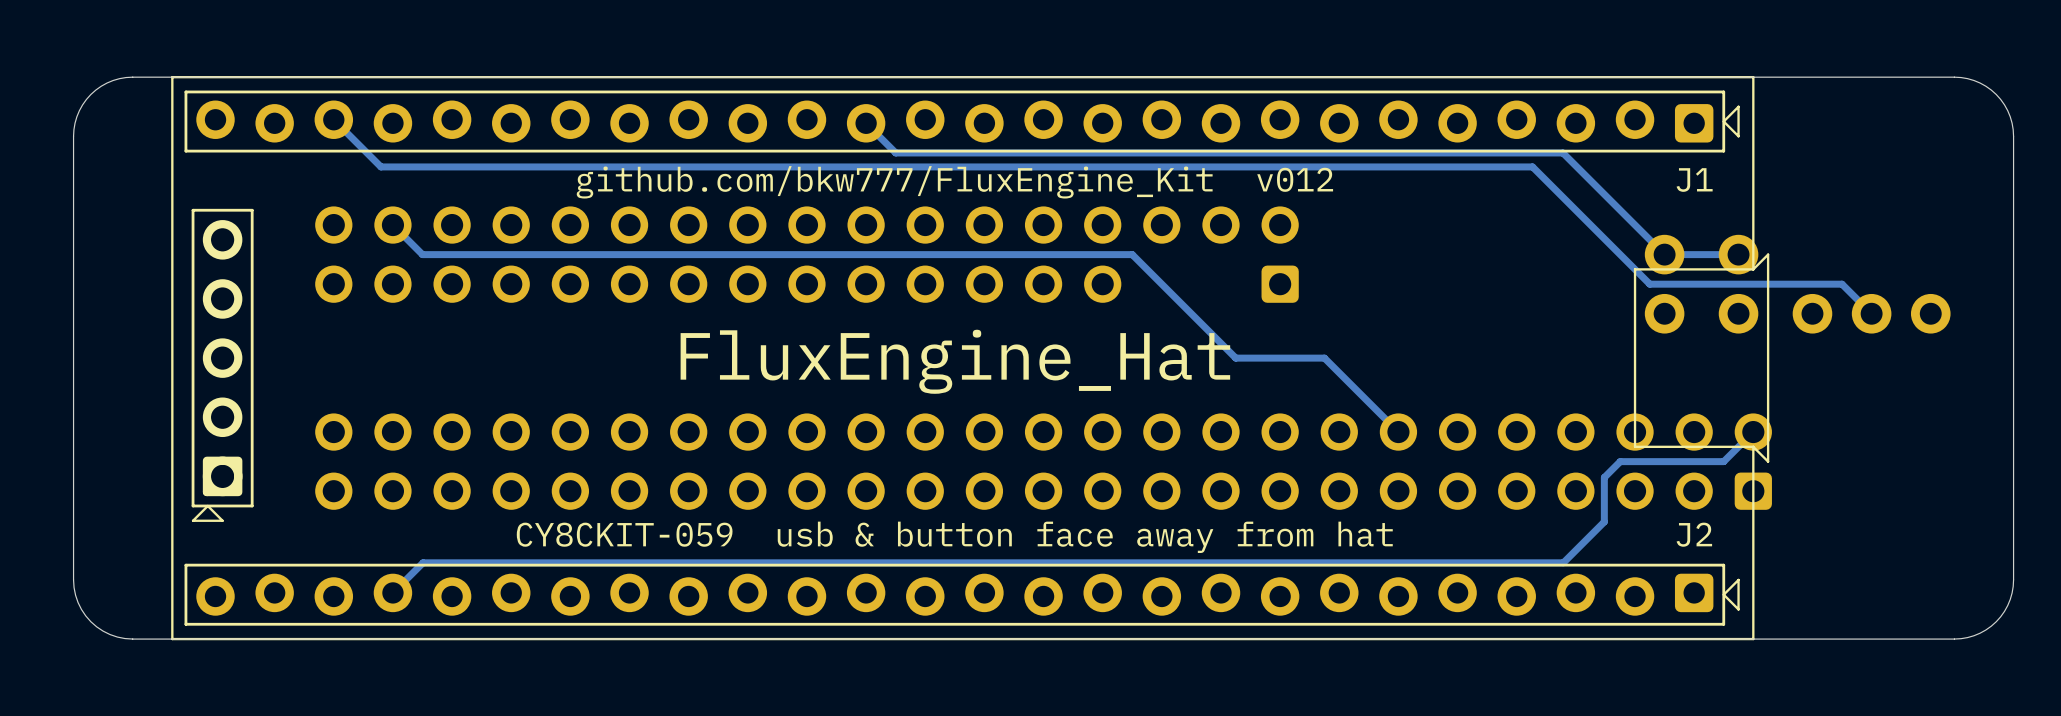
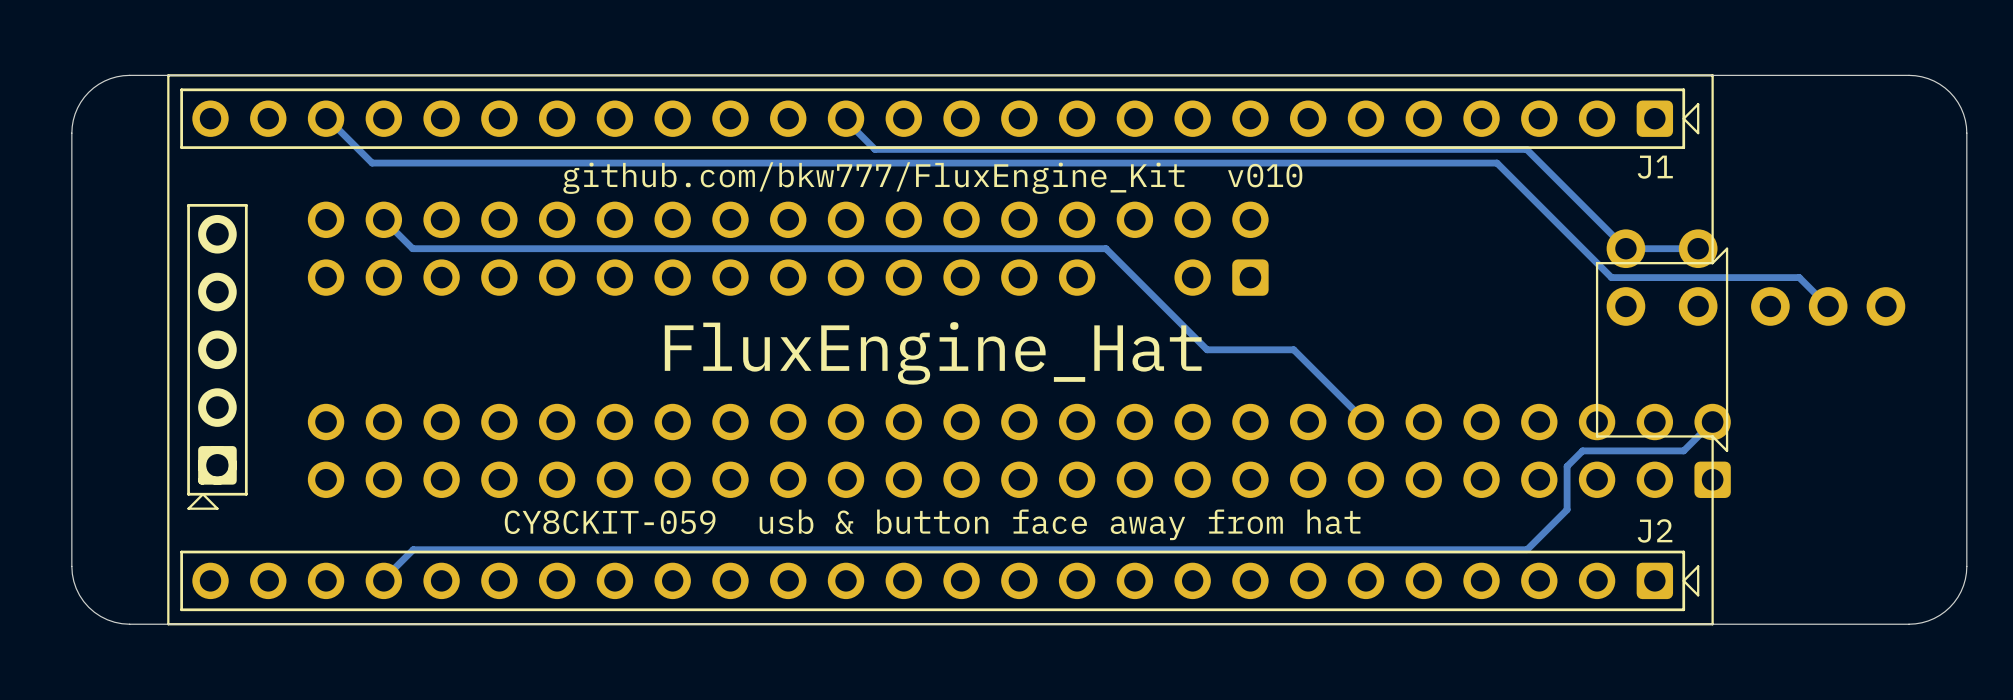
part footprint: [171, 76, 1770, 641] -> [167, 74, 1729, 626]
text: github.com/bkw777/FluxEngine_Kit v012 (954, 182) -> github.com/bkw777/FluxEngine_Kit v010 (932, 178)
part footprint: [315, 206, 1299, 303] -> [307, 201, 1269, 296]

